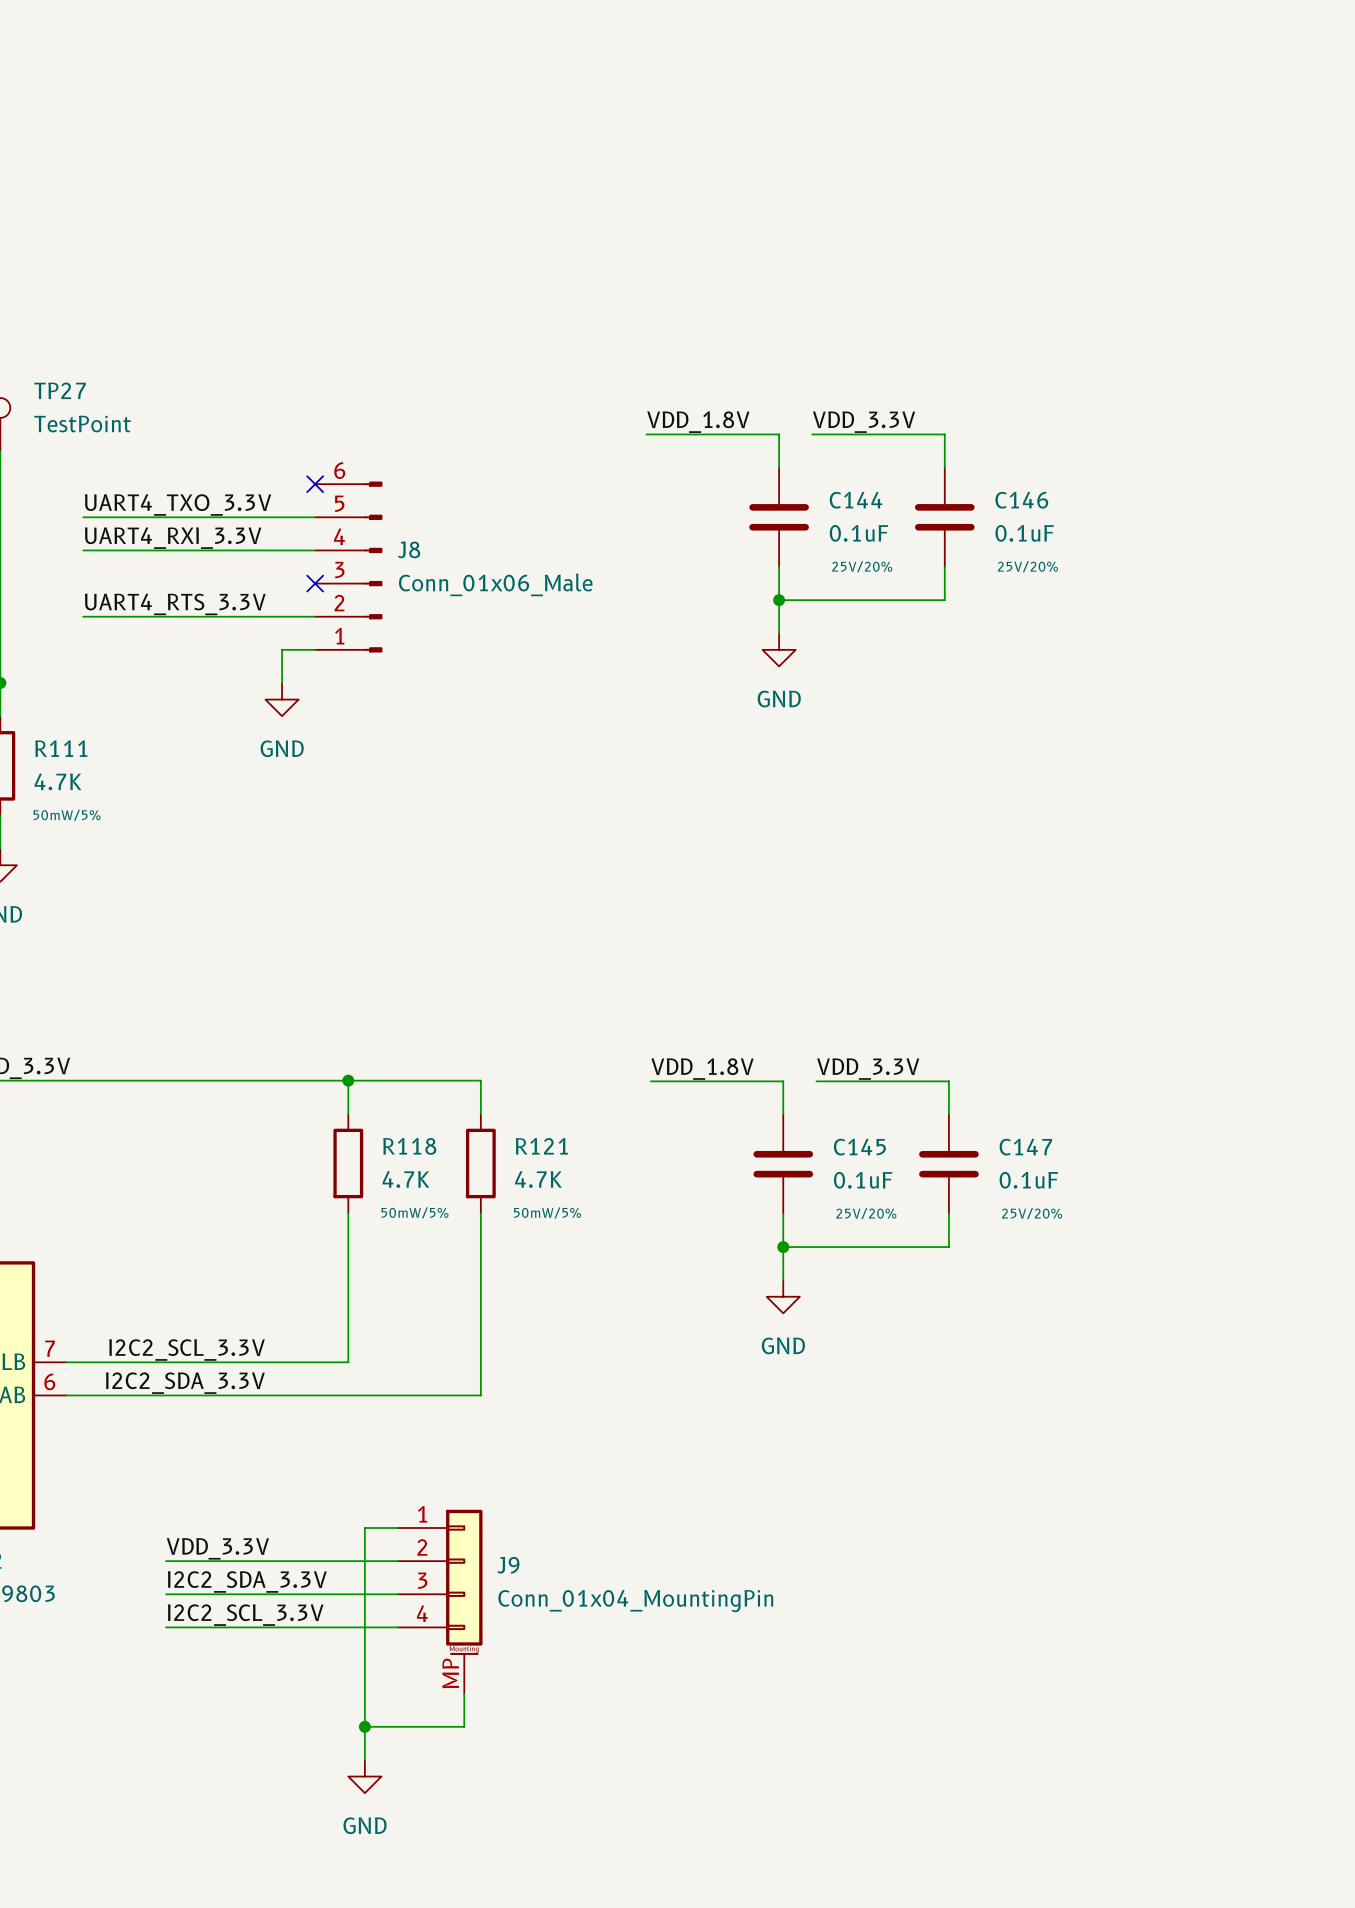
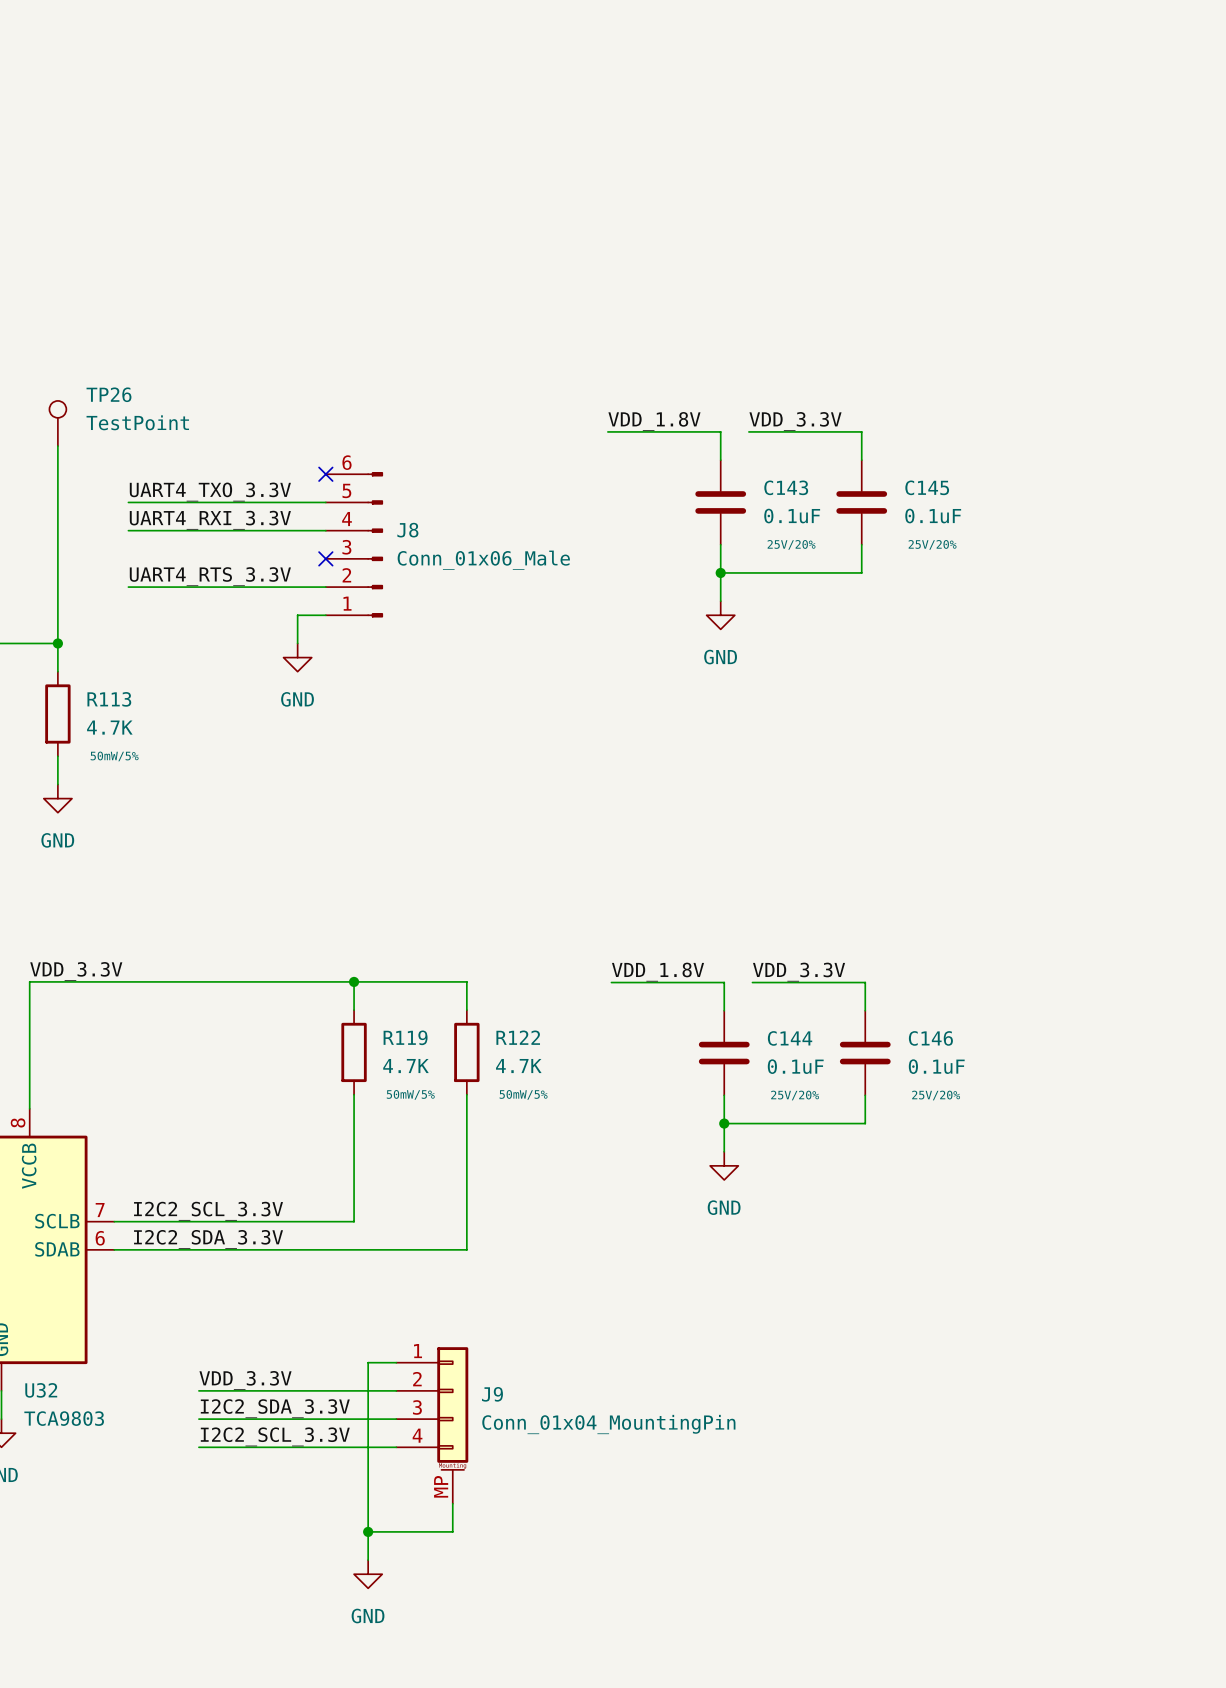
TP27 name: TP27 (60, 390) -> TP26 (108, 394)
C144 name: C144 (855, 500) -> C143 (786, 487)
C146 name: C146 (1021, 500) -> C145 (927, 487)
R111 name: R111 (61, 748) -> R113 (109, 699)
R118 name: R118 (409, 1146) -> R119 (405, 1037)
R121 name: R121 (541, 1146) -> R122 (518, 1037)
C145 name: C145 (859, 1147) -> C144 (790, 1038)
C147 name: C147 (1025, 1147) -> C146 (930, 1038)

